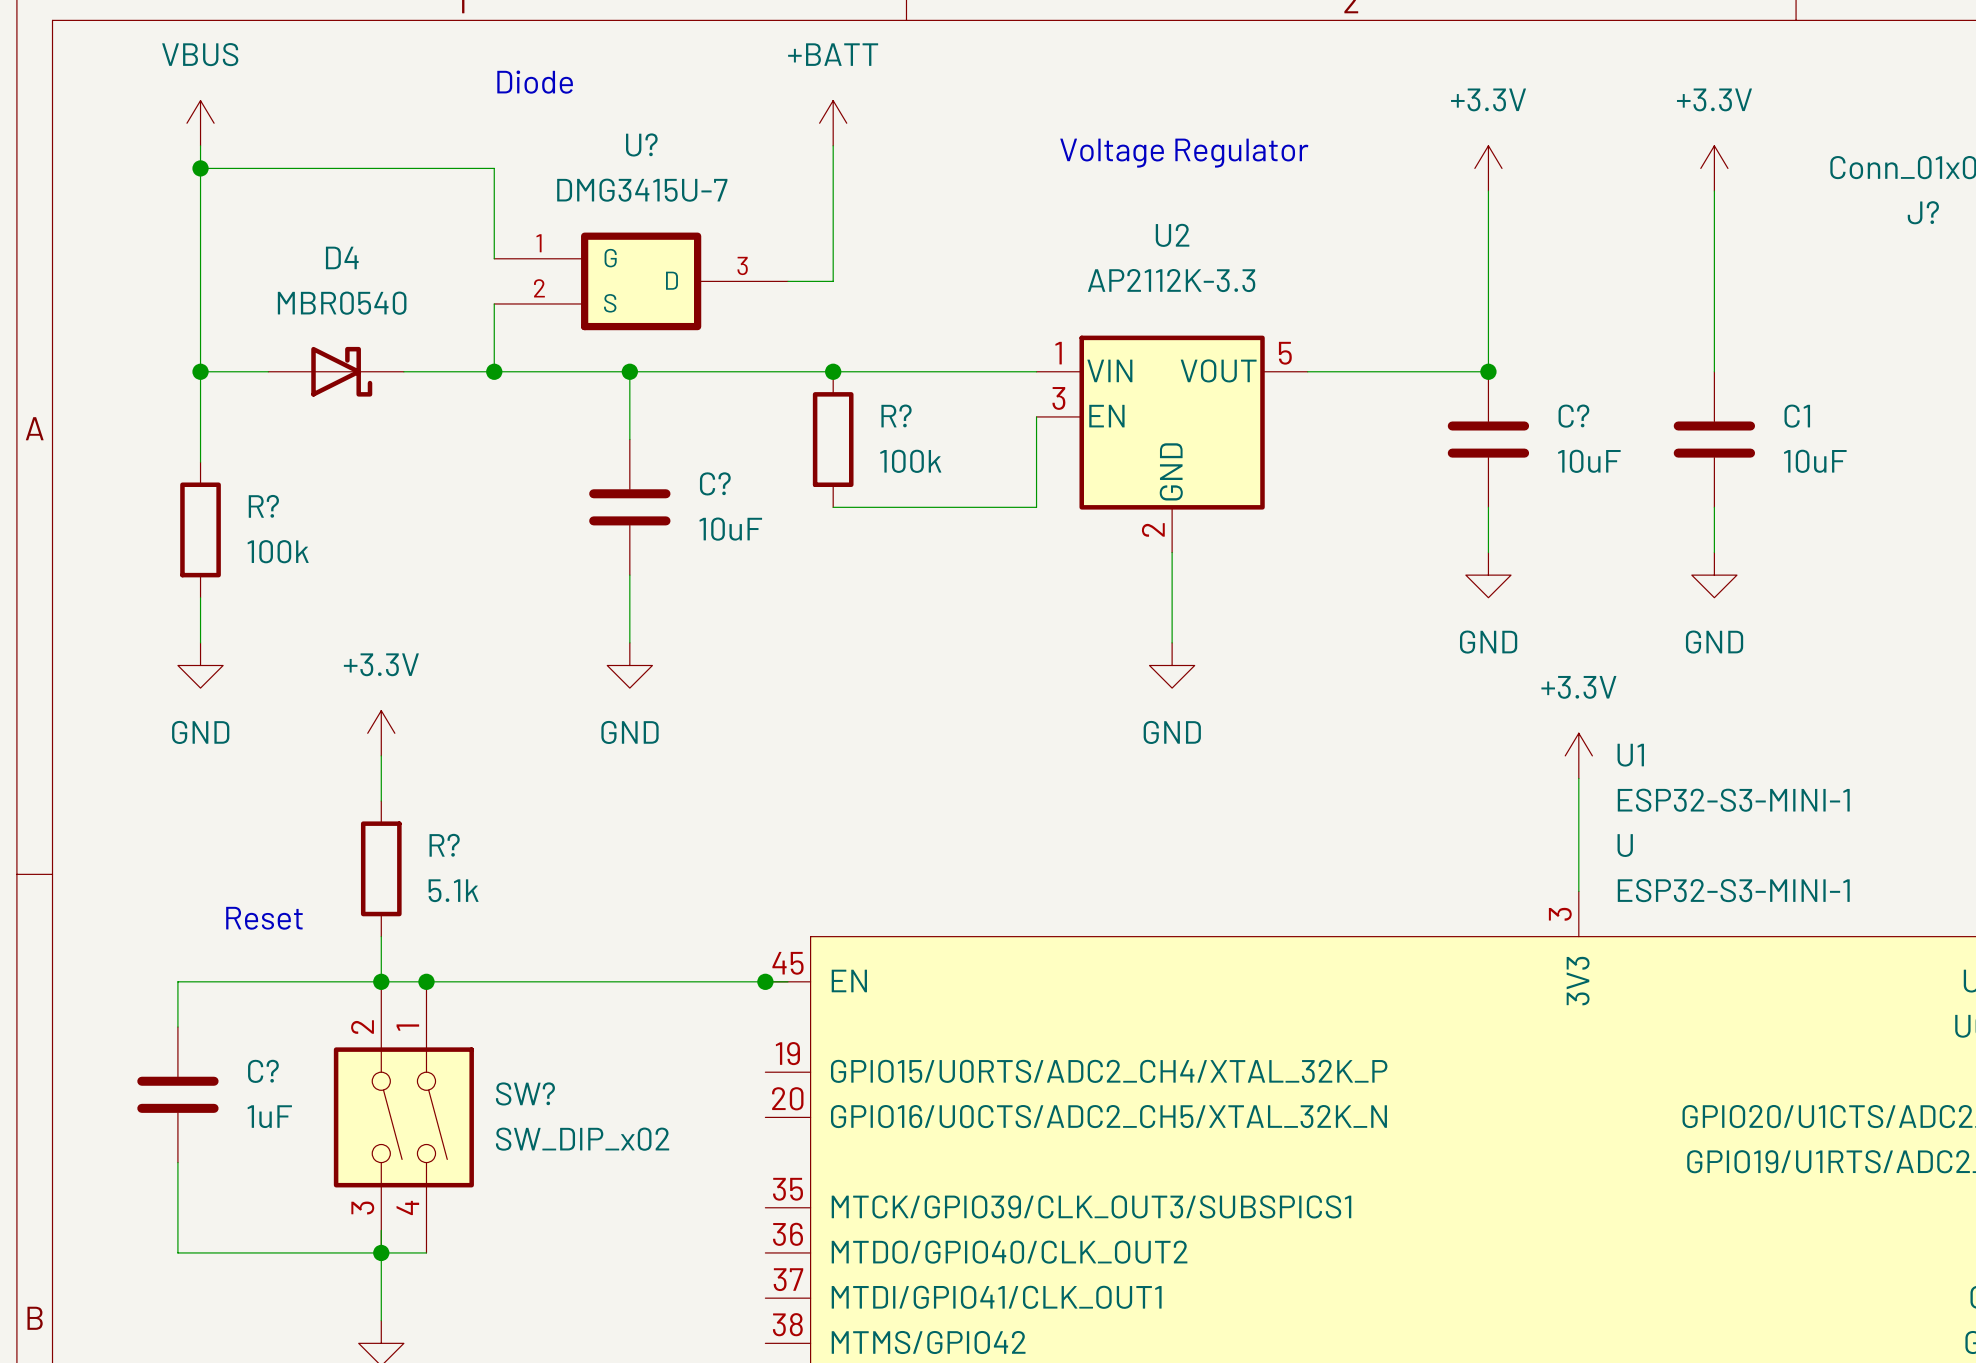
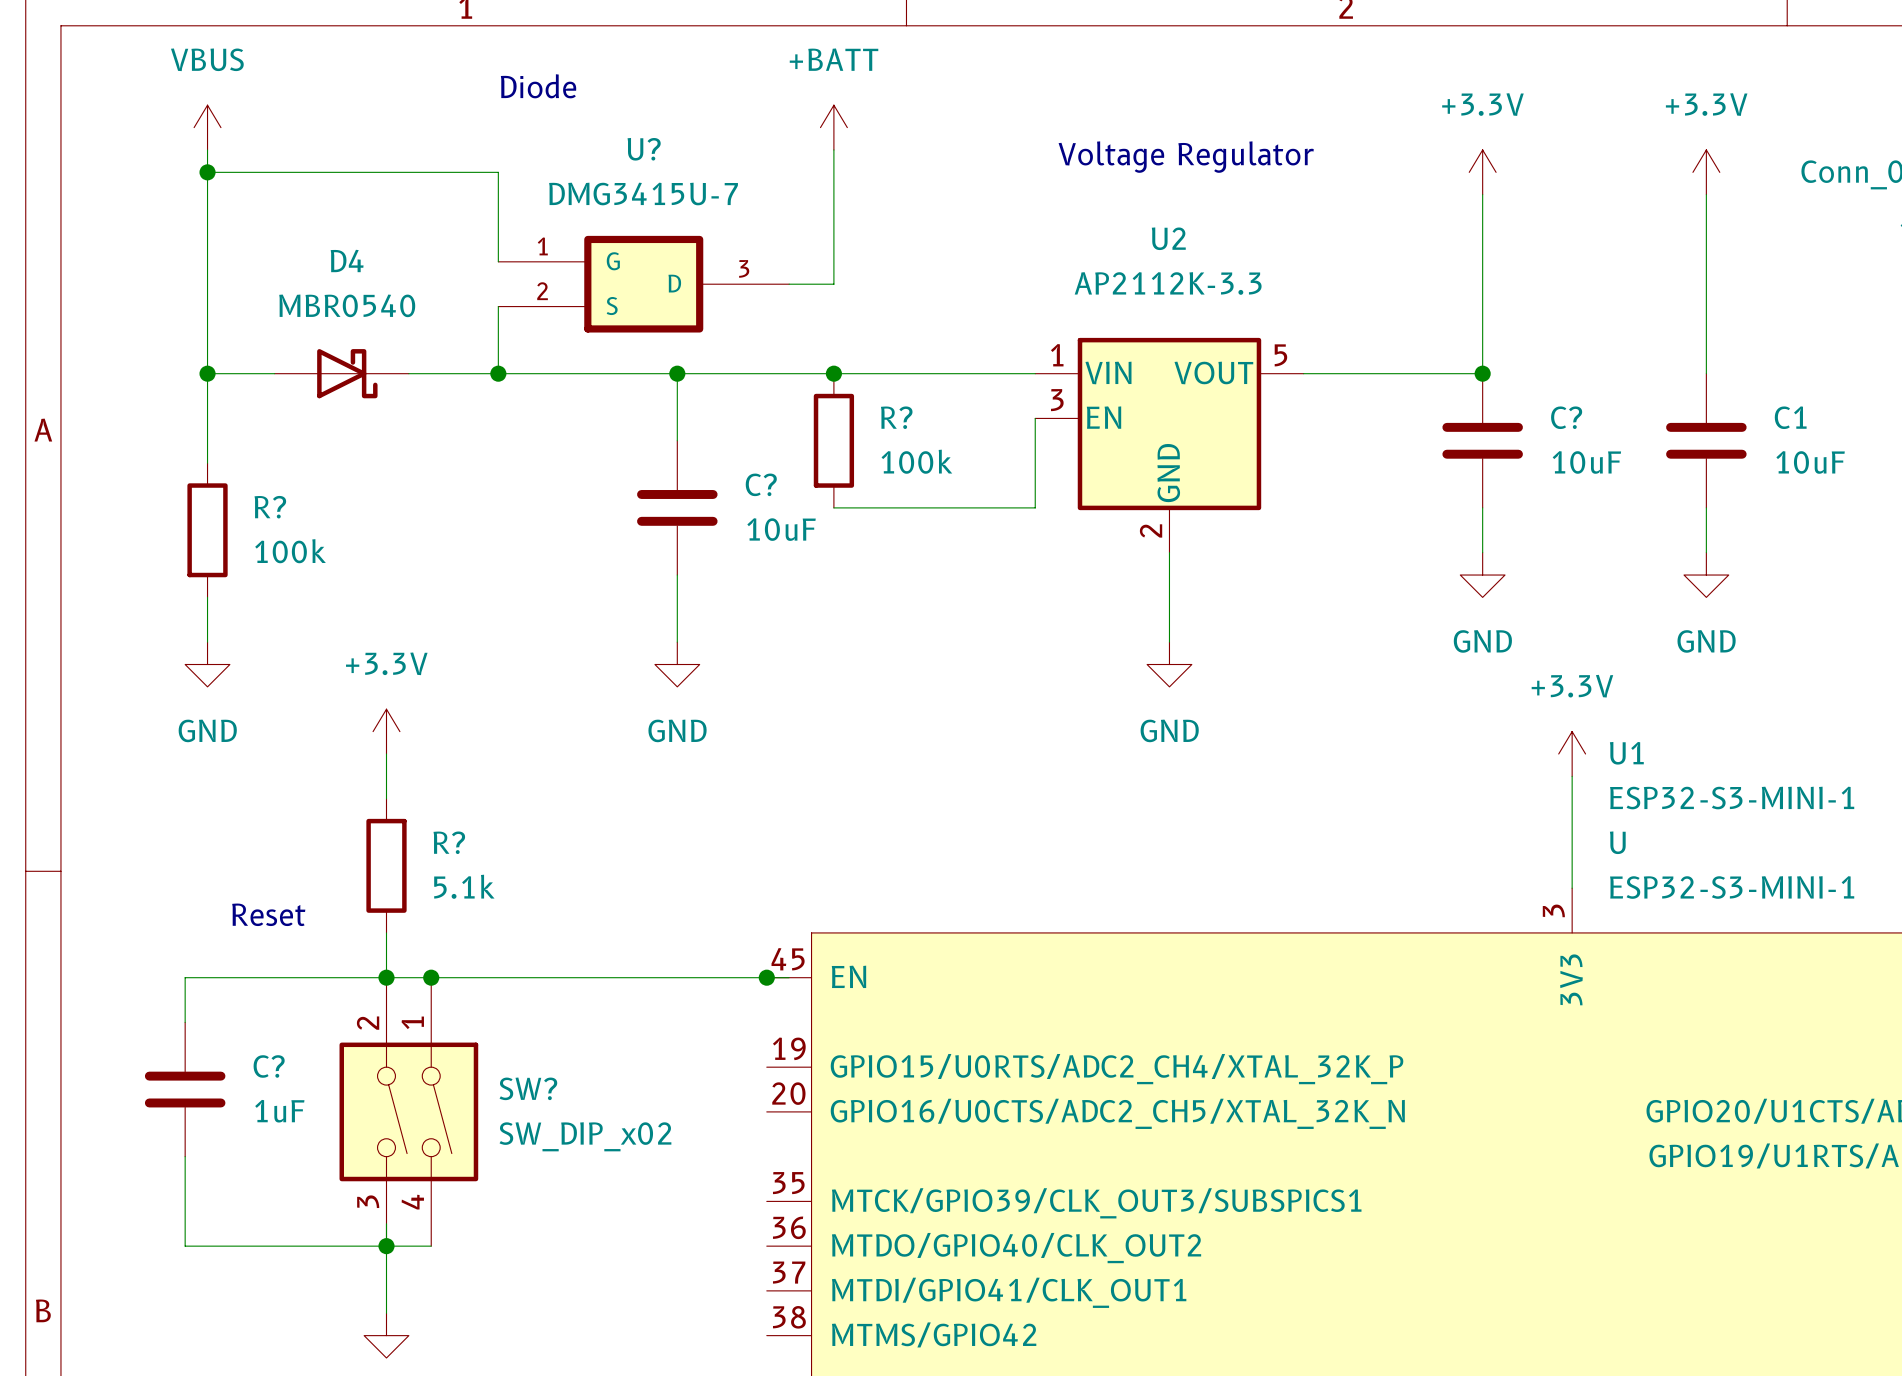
wire: (629, 371) (629, 439) -> (677, 373) (677, 440)
junction position: (629, 371) -> (677, 373)
C? position: (629, 507) -> (677, 507)
wire: (629, 575) (629, 642) -> (677, 575) (677, 642)
power symbol position: GND (629, 665) -> GND (677, 664)

